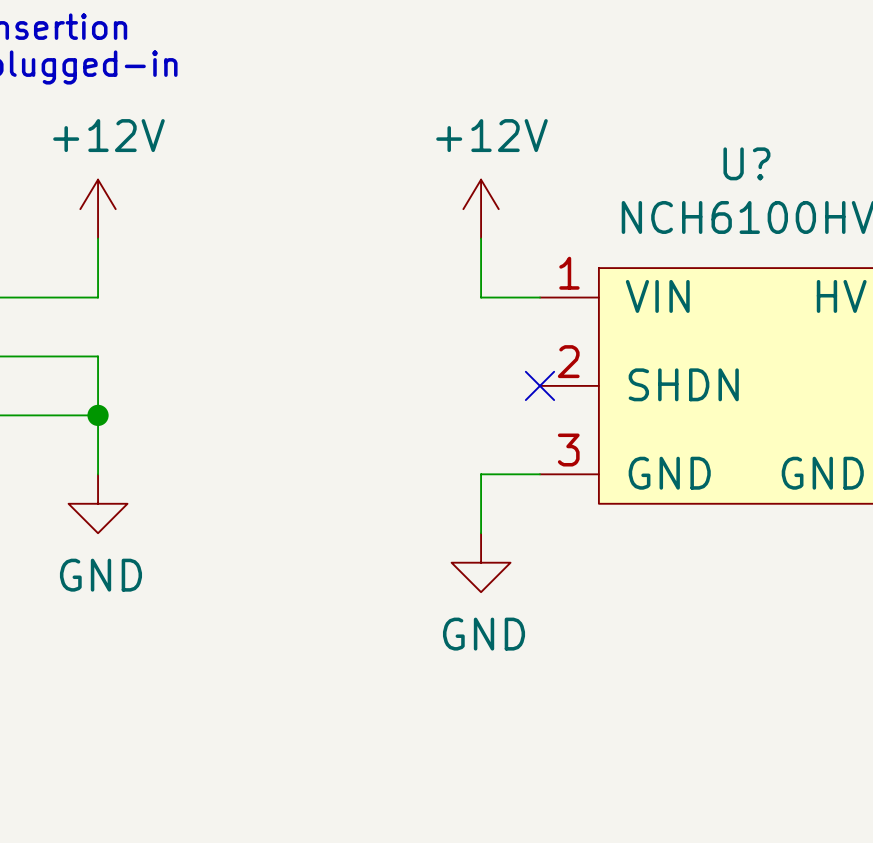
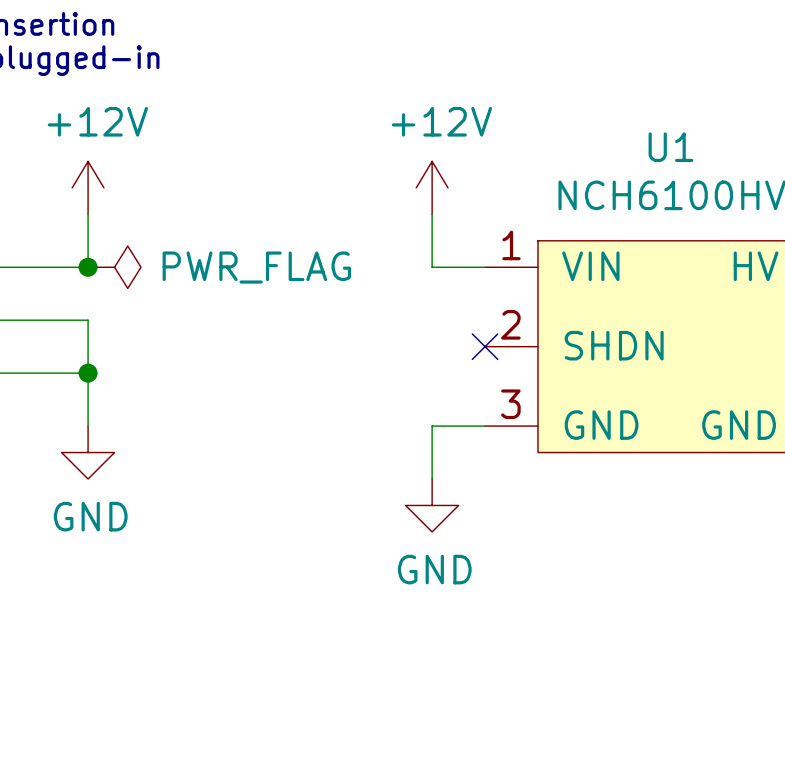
U? name: U? (746, 163) -> U1 (670, 147)
junction: none -> (88, 267)
power symbol: none -> PWR_FLAG (114, 267)

